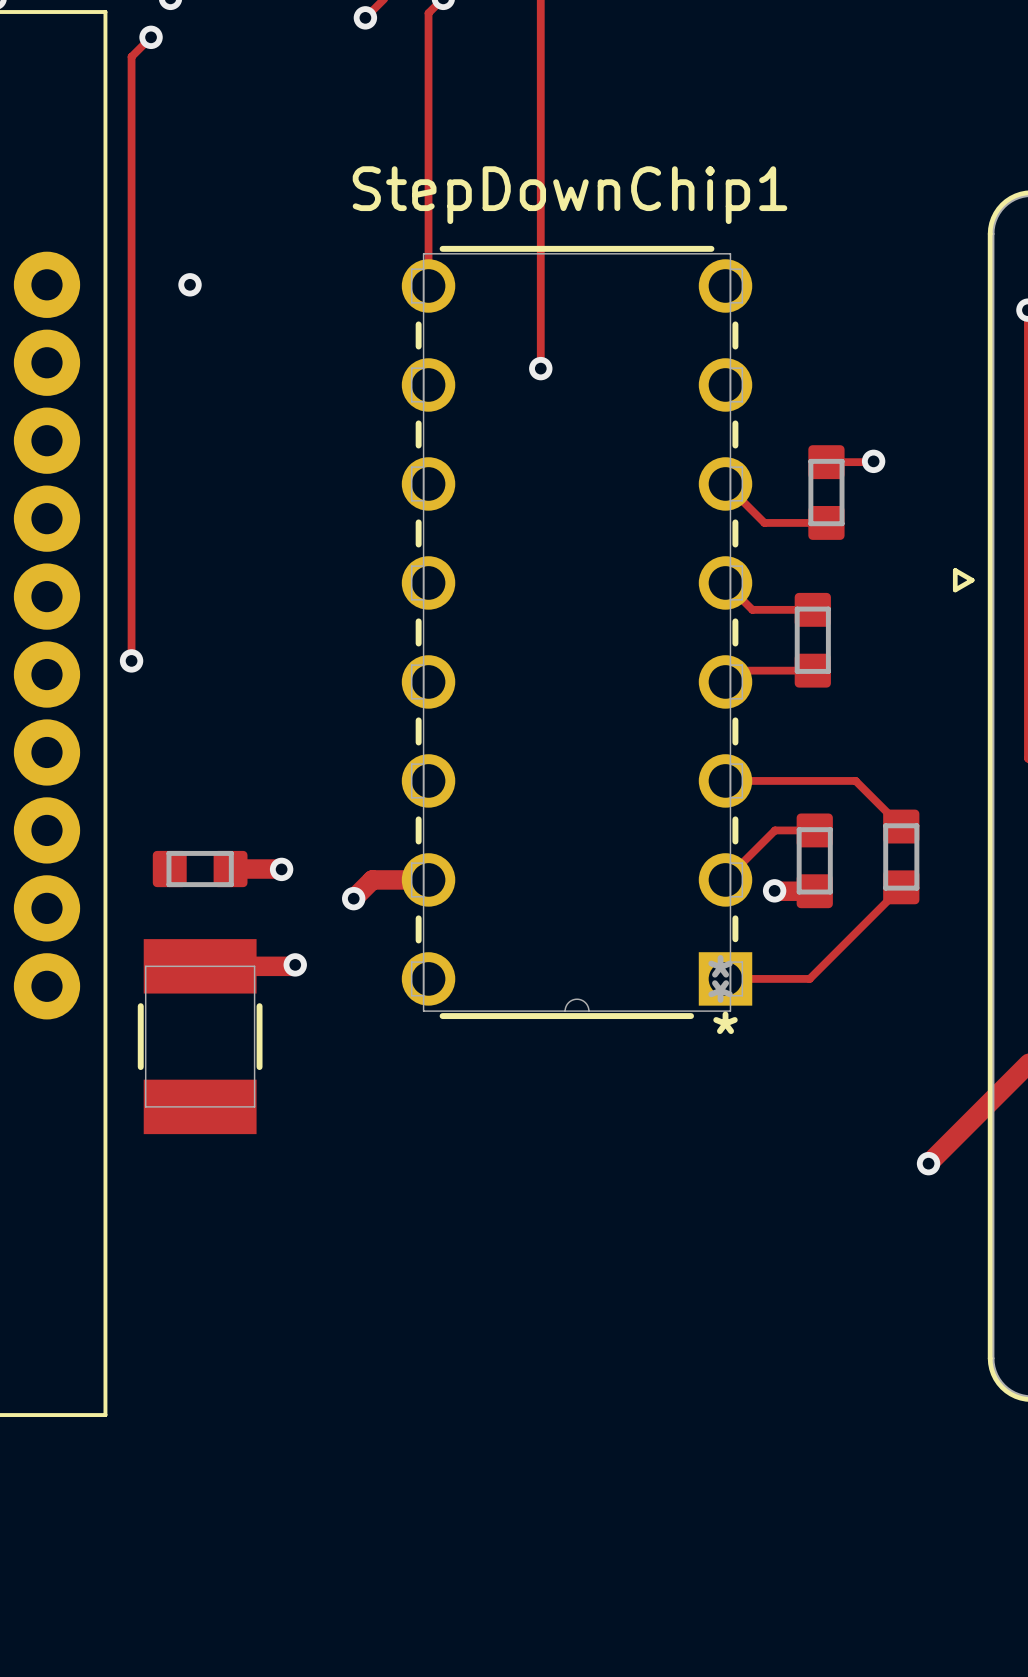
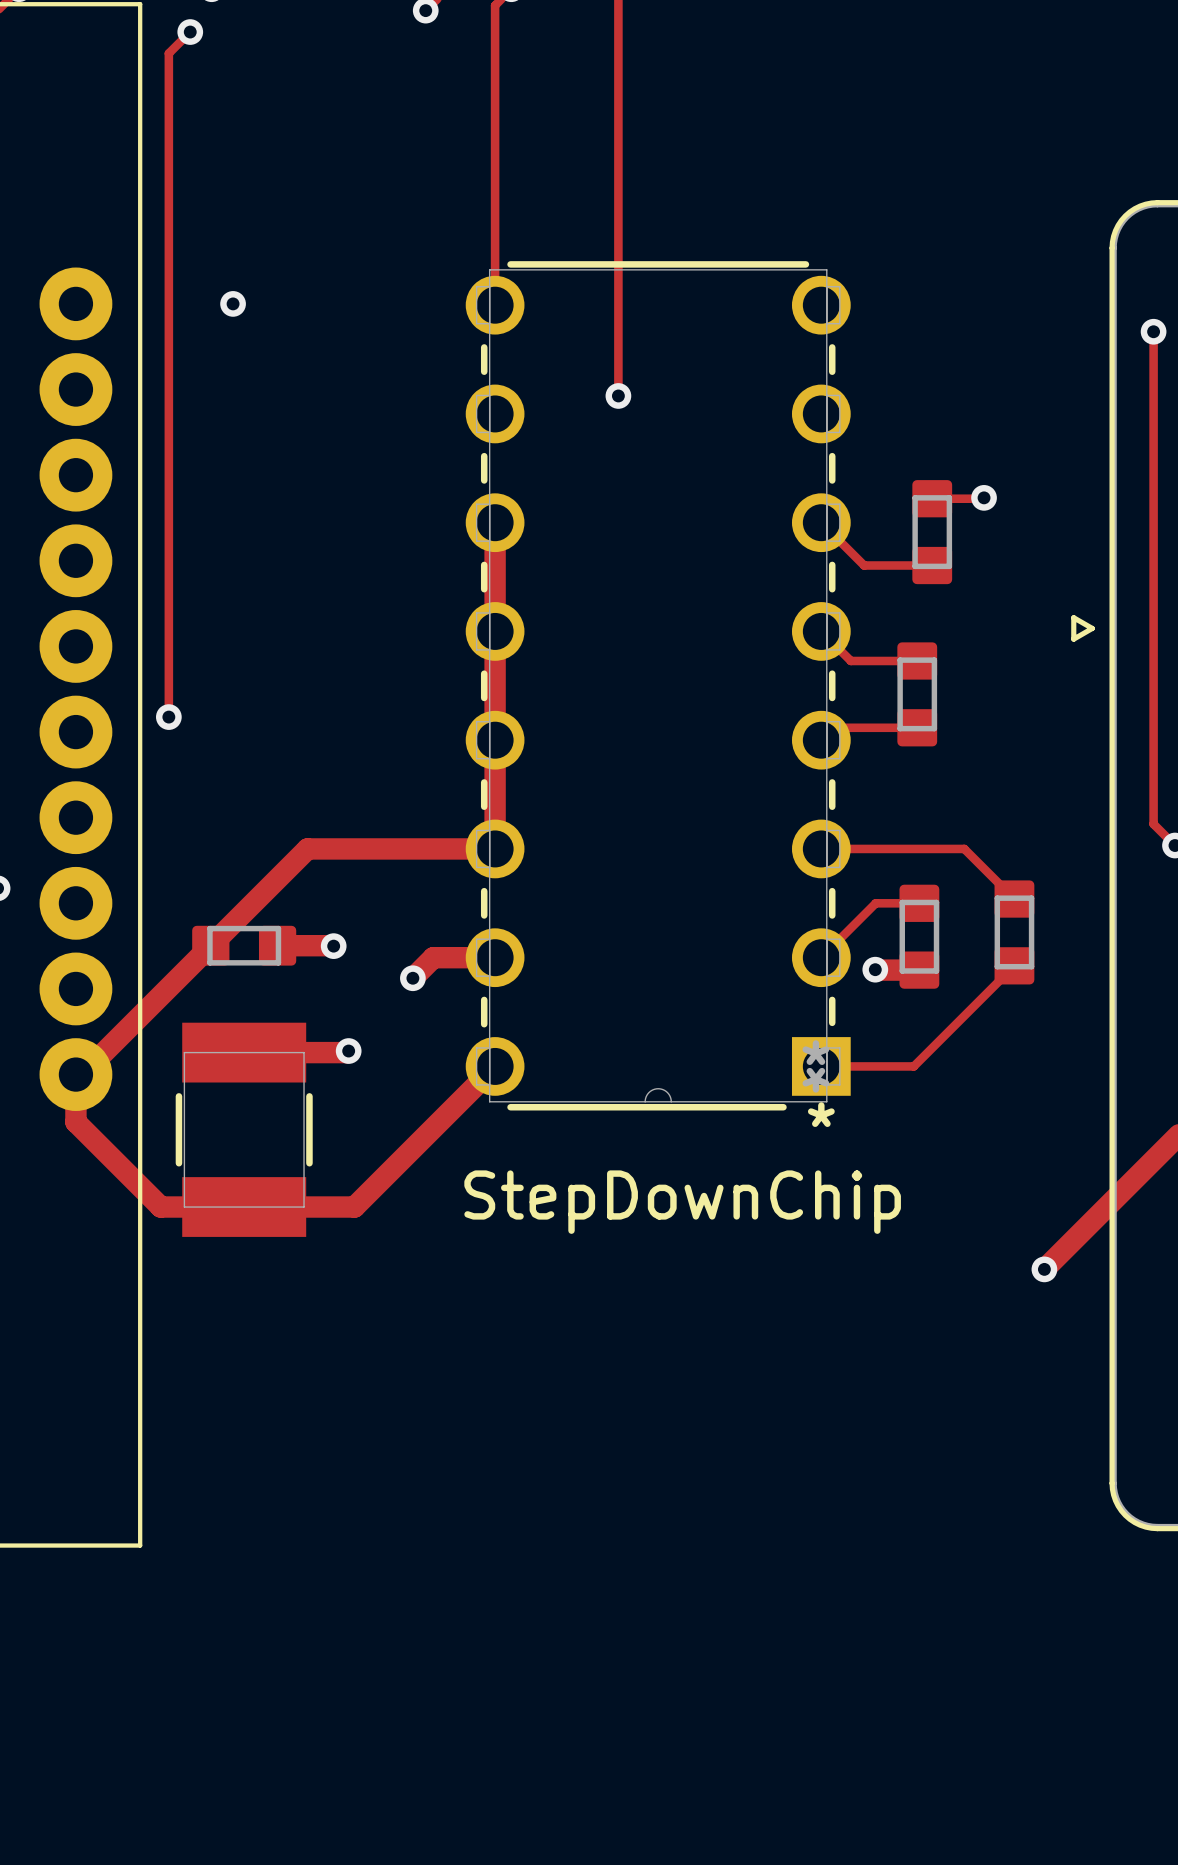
StepDownChip1 name: StepDownChip1 (570, 195) -> StepDownChip (682, 1202)
track: none -> (495, 522) (495, 848) (307, 848) (81, 1074) (75, 1074) (75, 1122) (160, 1207) (354, 1207) (495, 1066)

